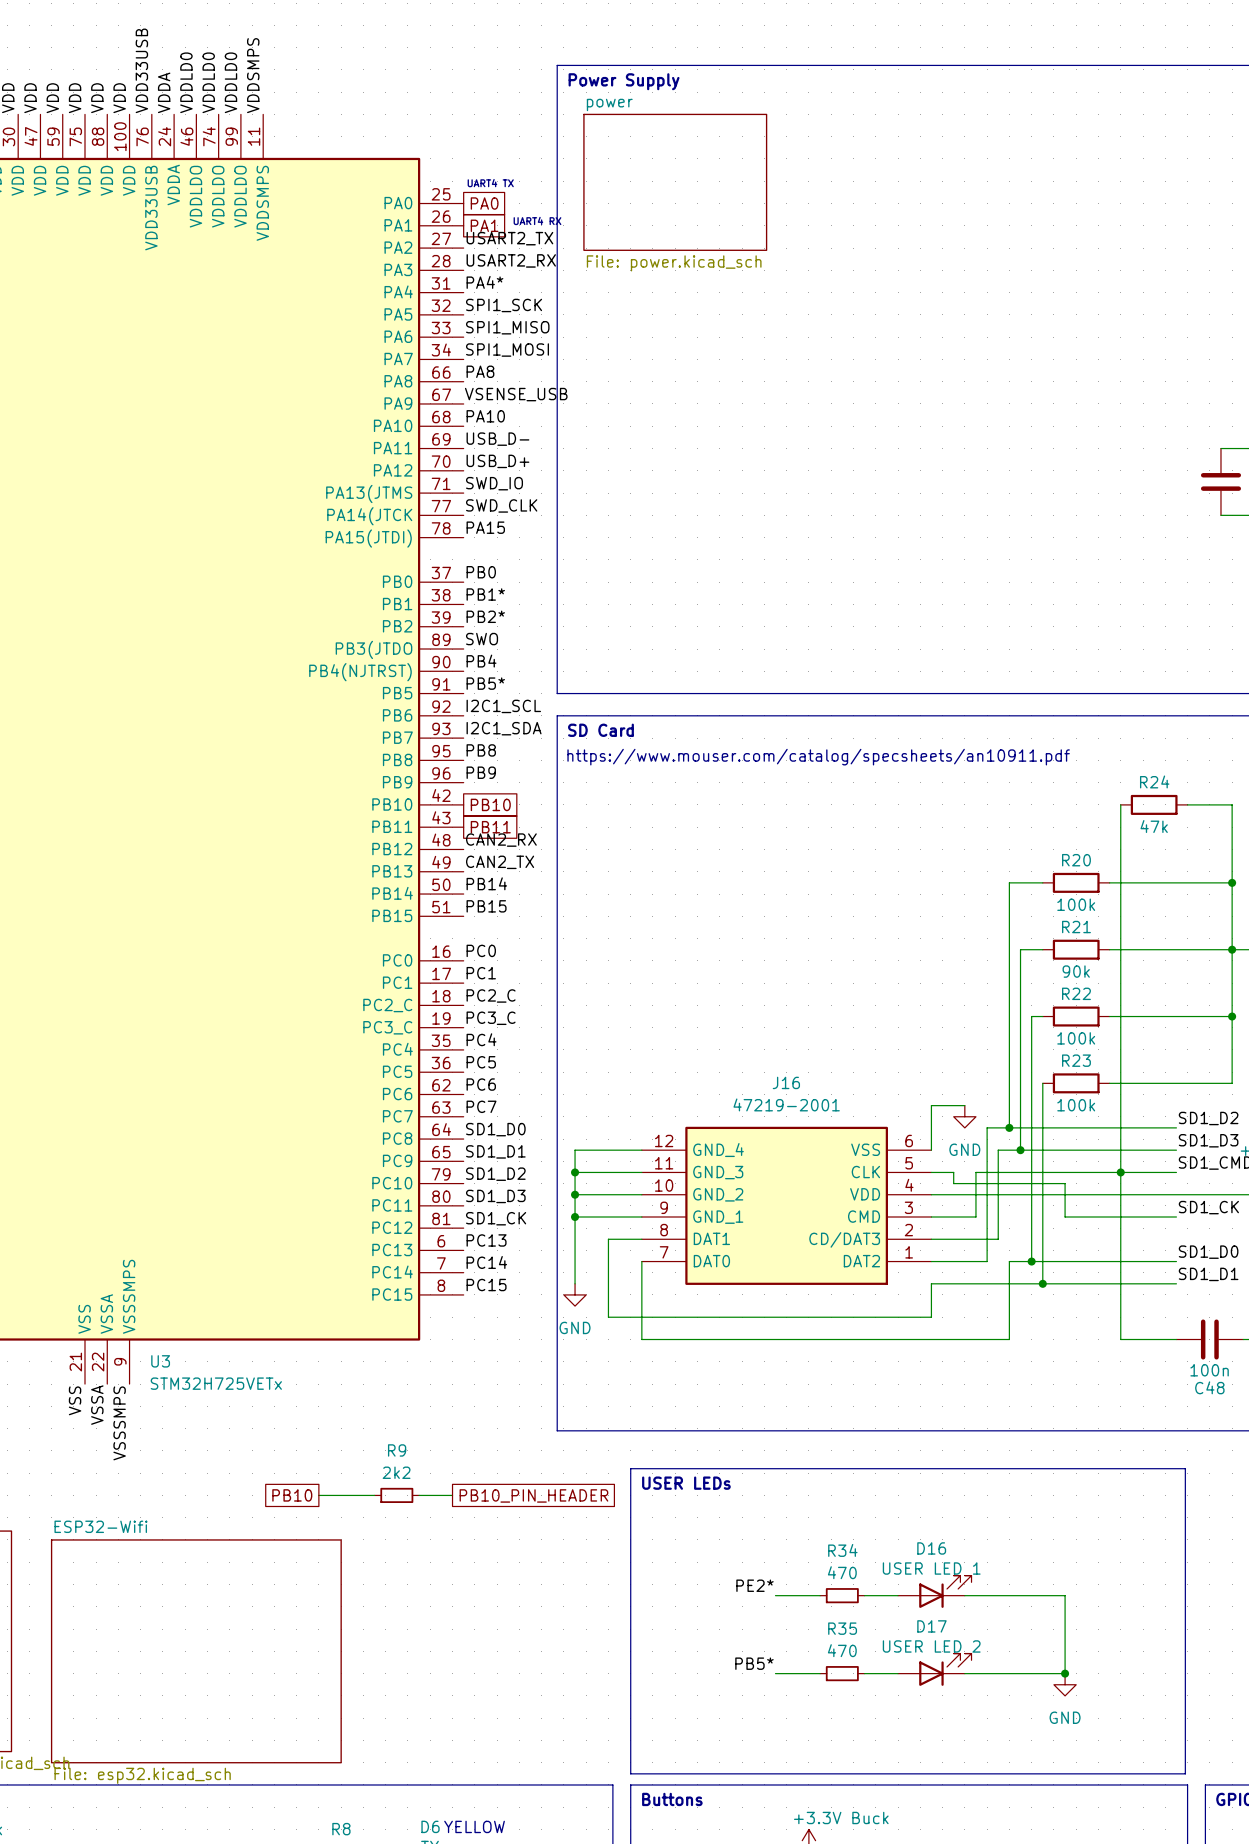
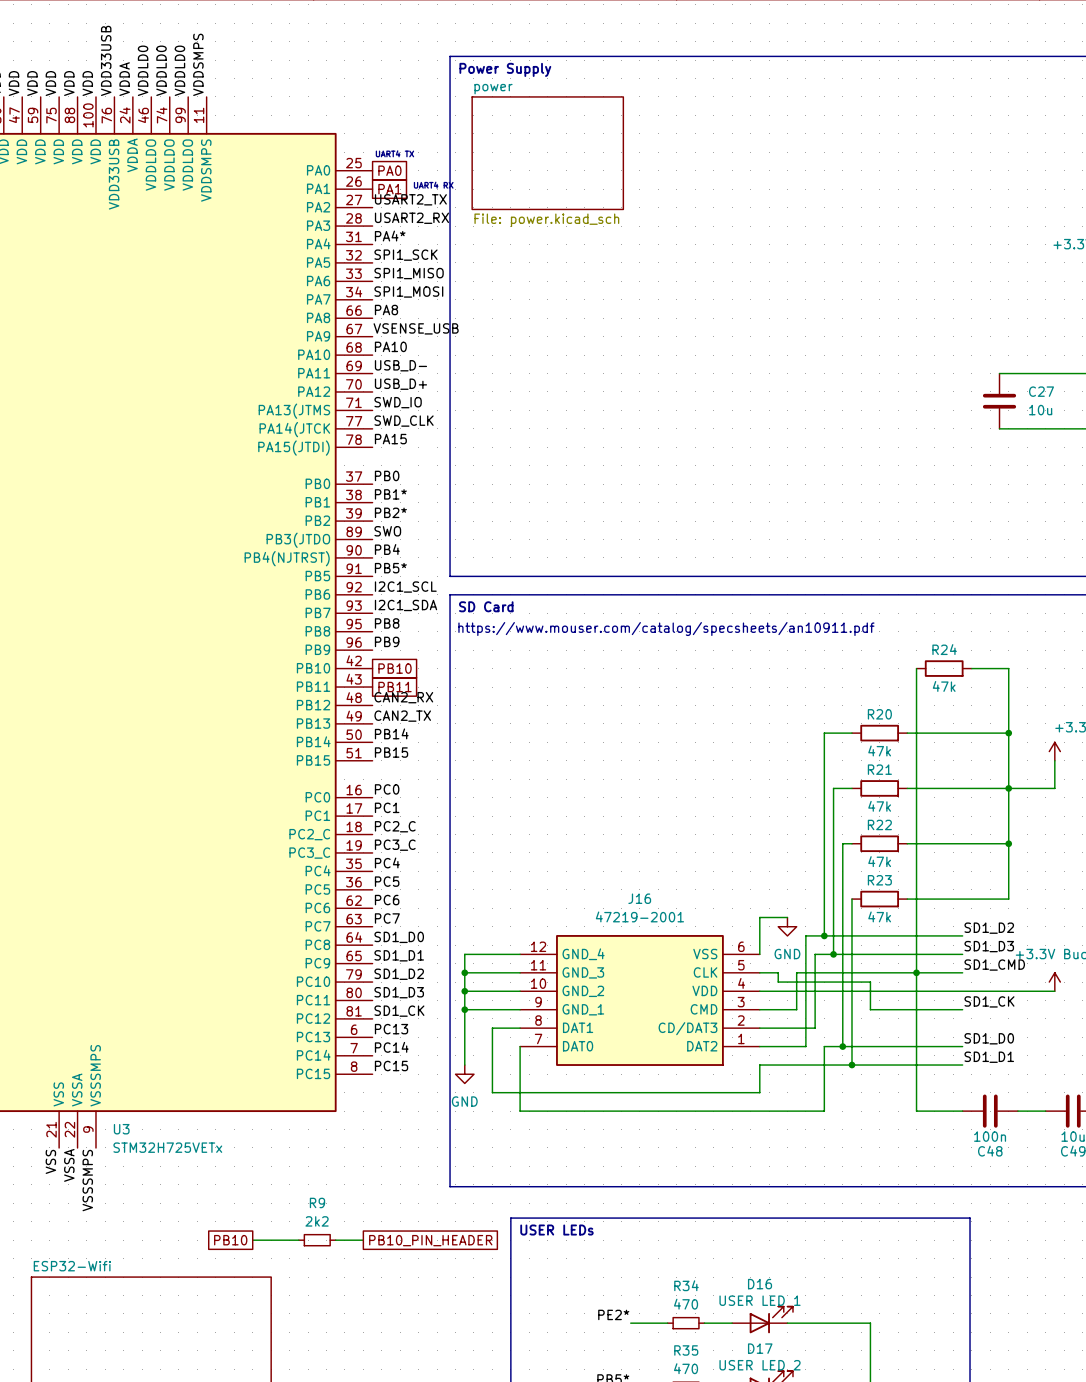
R20 value: 100k (1076, 904) -> 47k (879, 750)
R21 value: 90k (1076, 971) -> 47k (879, 806)
R22 value: 100k (1076, 1038) -> 47k (879, 861)
R23 value: 100k (1076, 1105) -> 47k (879, 916)

